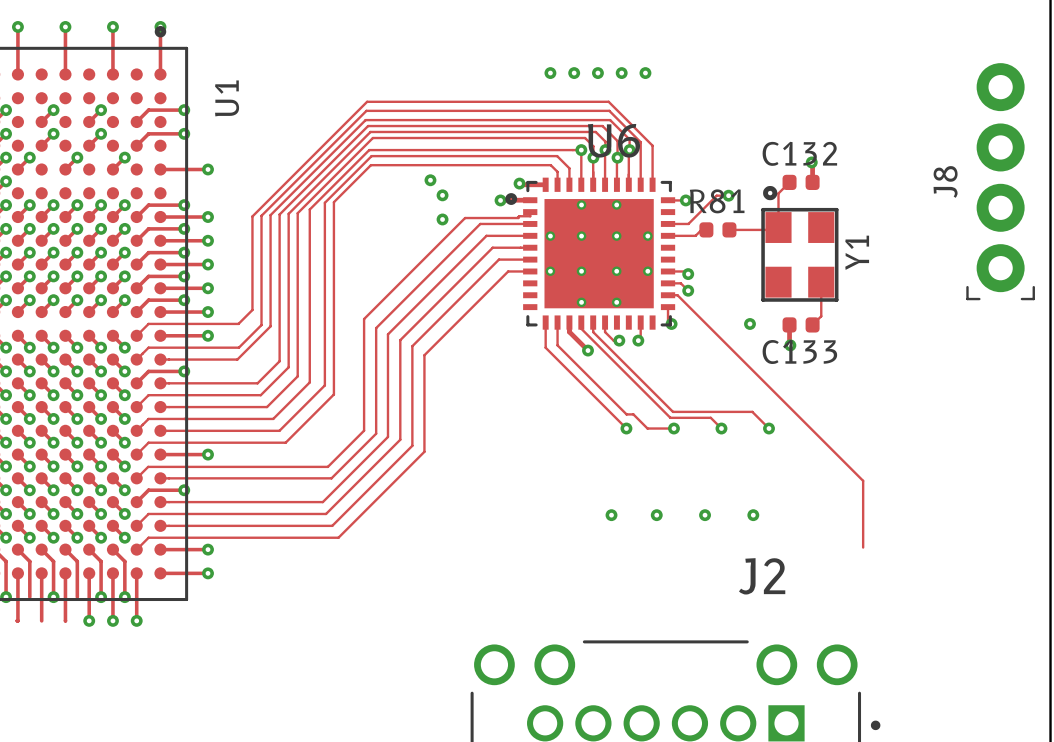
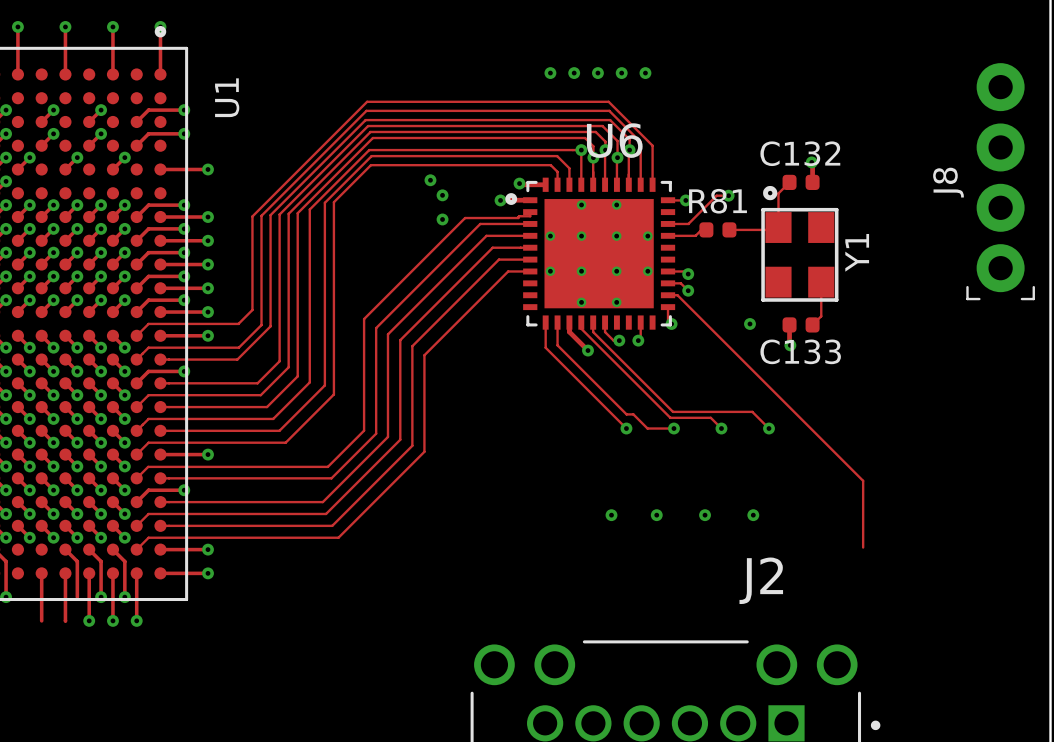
track: (17, 549) (29, 561) (29, 597) -> none
track: (41, 549) (53, 561) (53, 597) -> none
track: (17, 573) (17, 620) -> none
via: (53, 597) -> none

